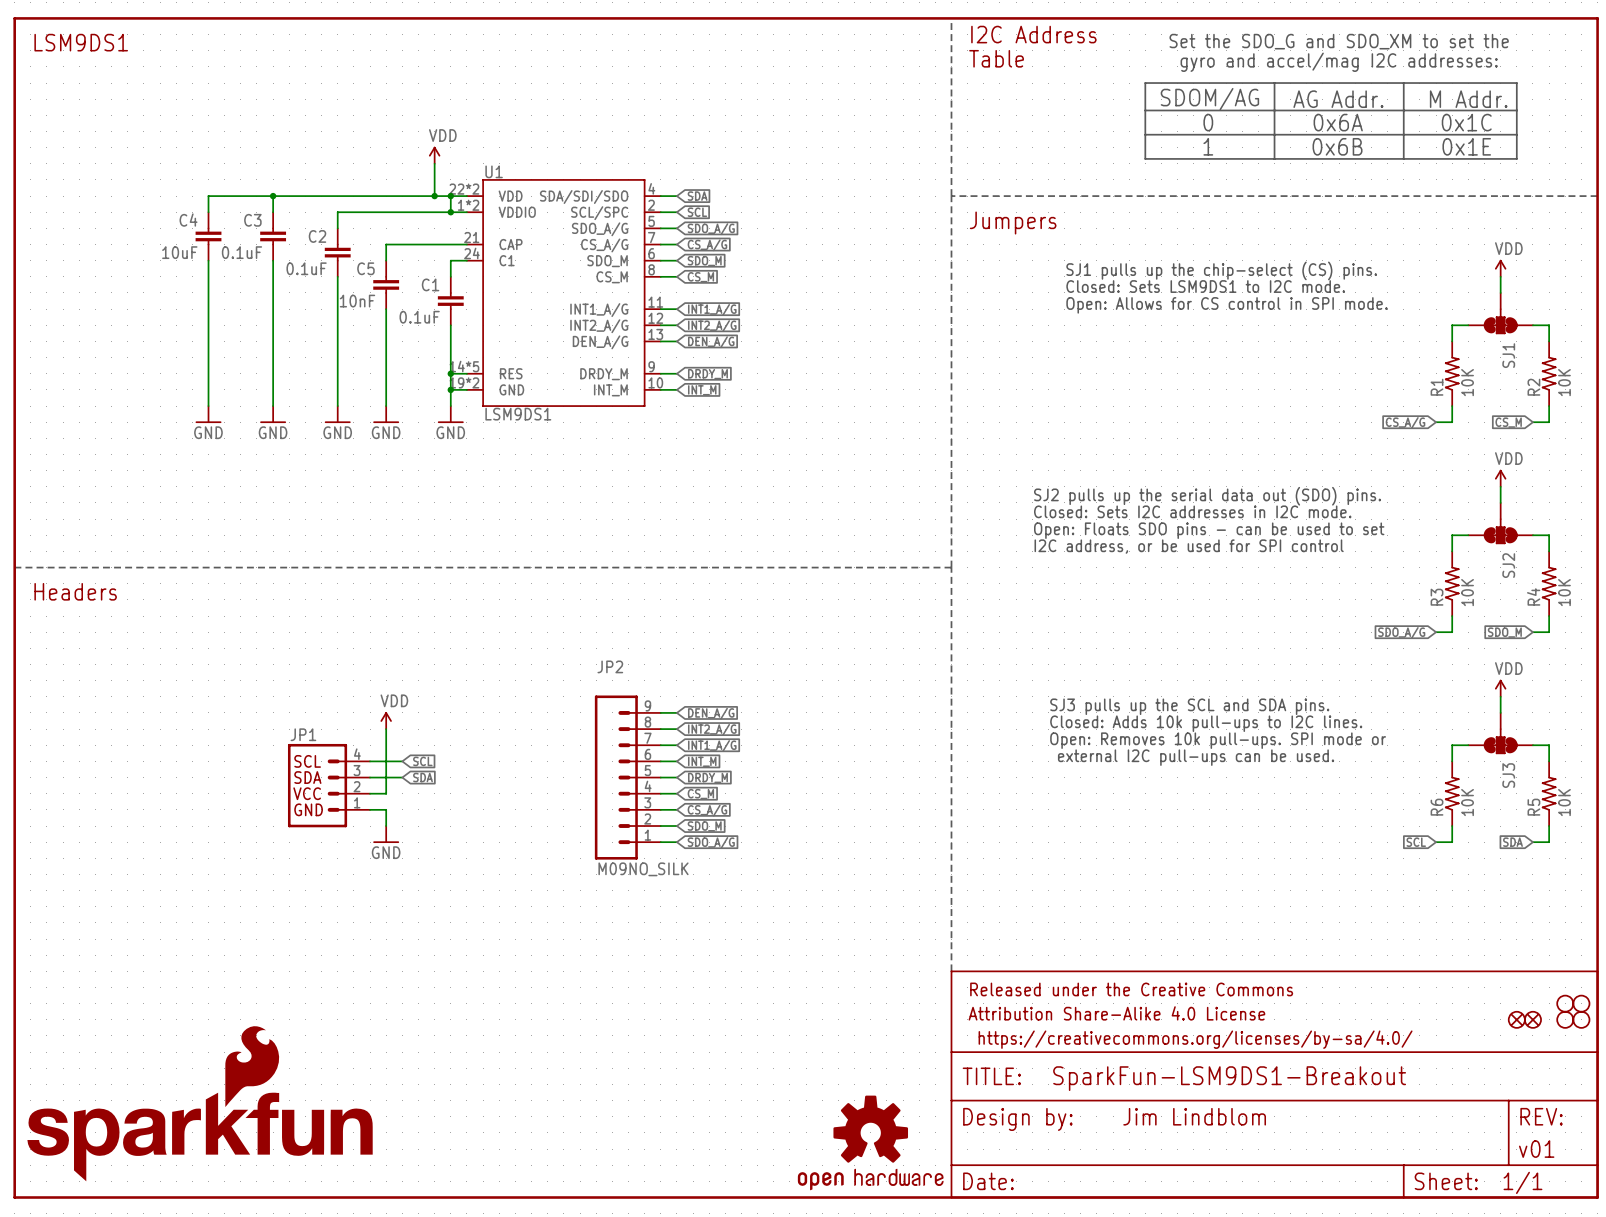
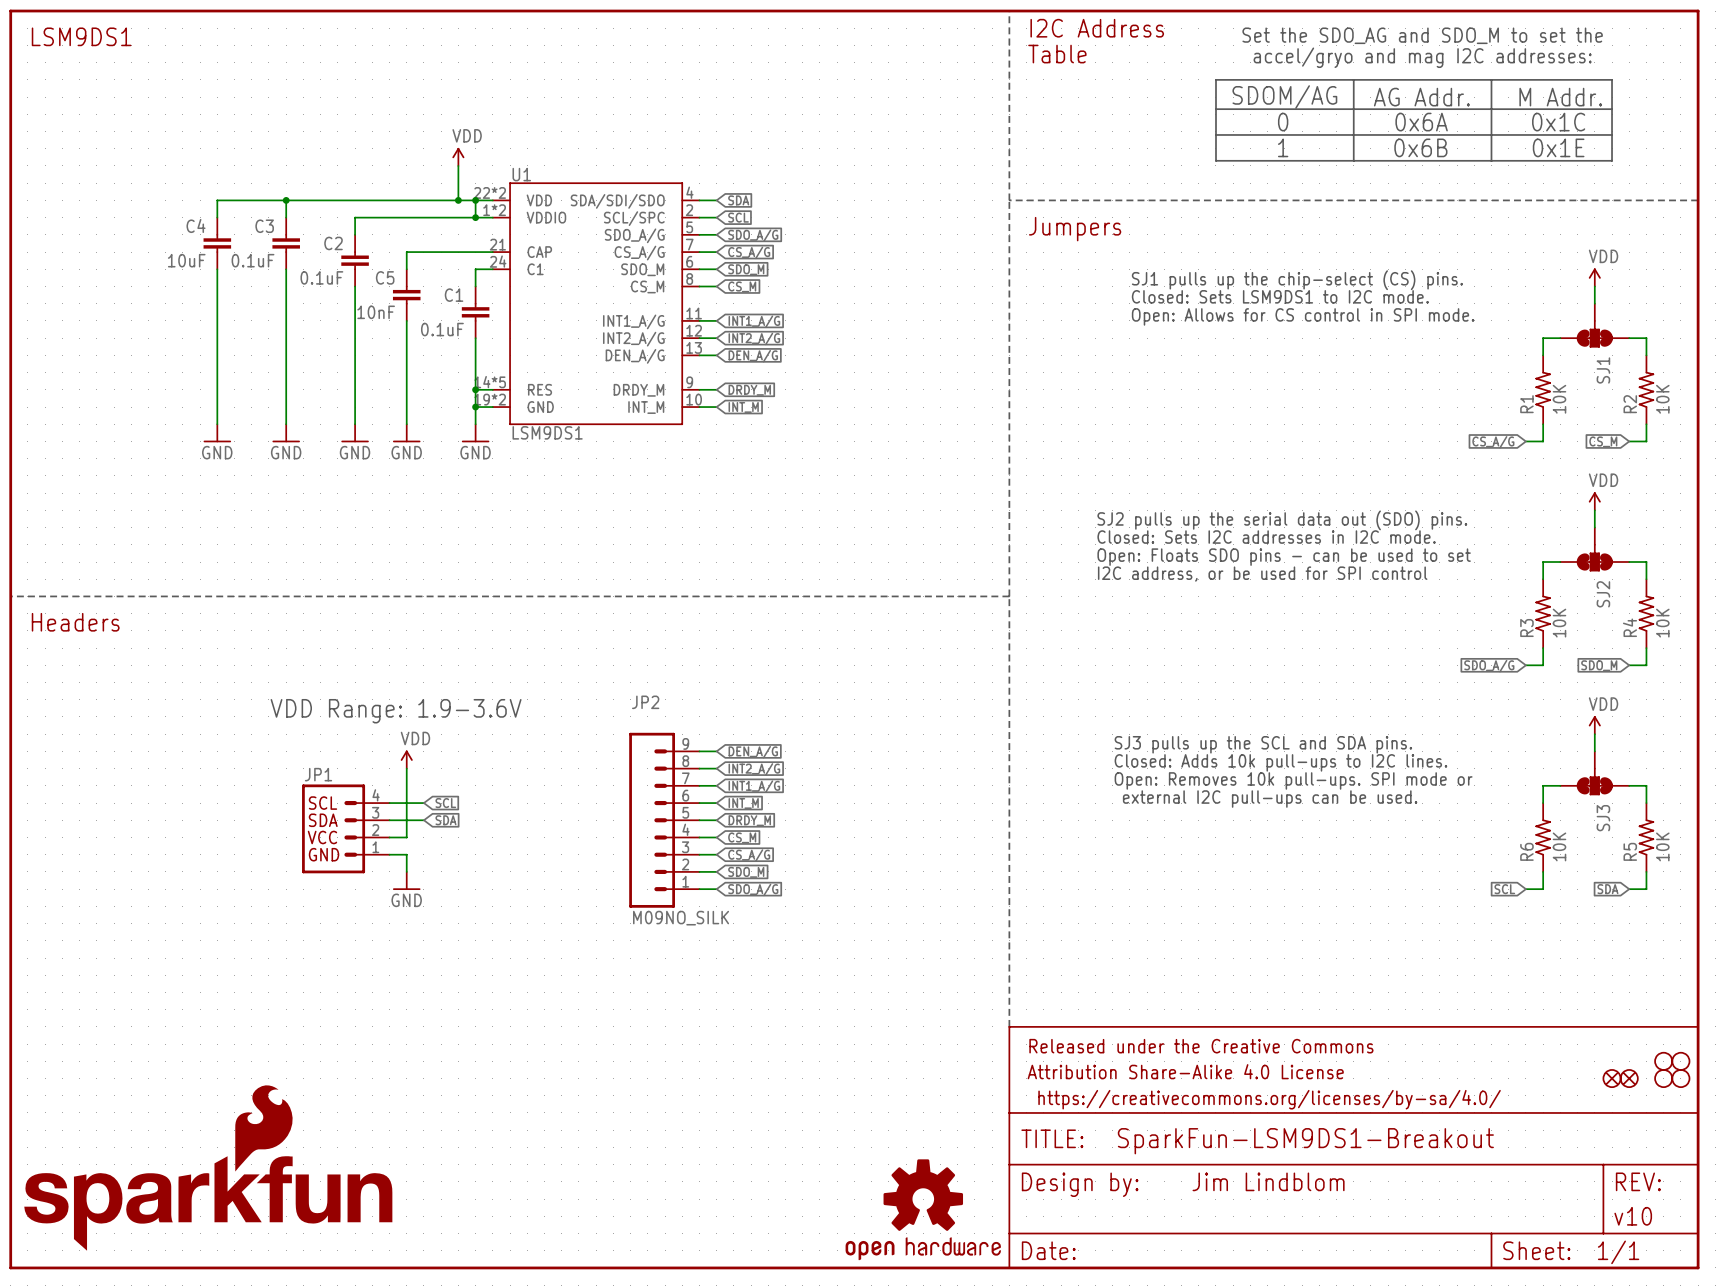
text: Set the SDO_G and SDO_XM to set the (1339, 41) -> Set the SDO_AG and SDO_M to set the (1422, 35)
text: gyro and accel/mag I2C addresses: (1339, 62) -> accel/gryo and mag I2C addresses: (1422, 57)
text: none -> VDD Range: 1.9-3.6V (396, 711)
part text: v01 (1536, 1149) -> v10 (1633, 1216)

